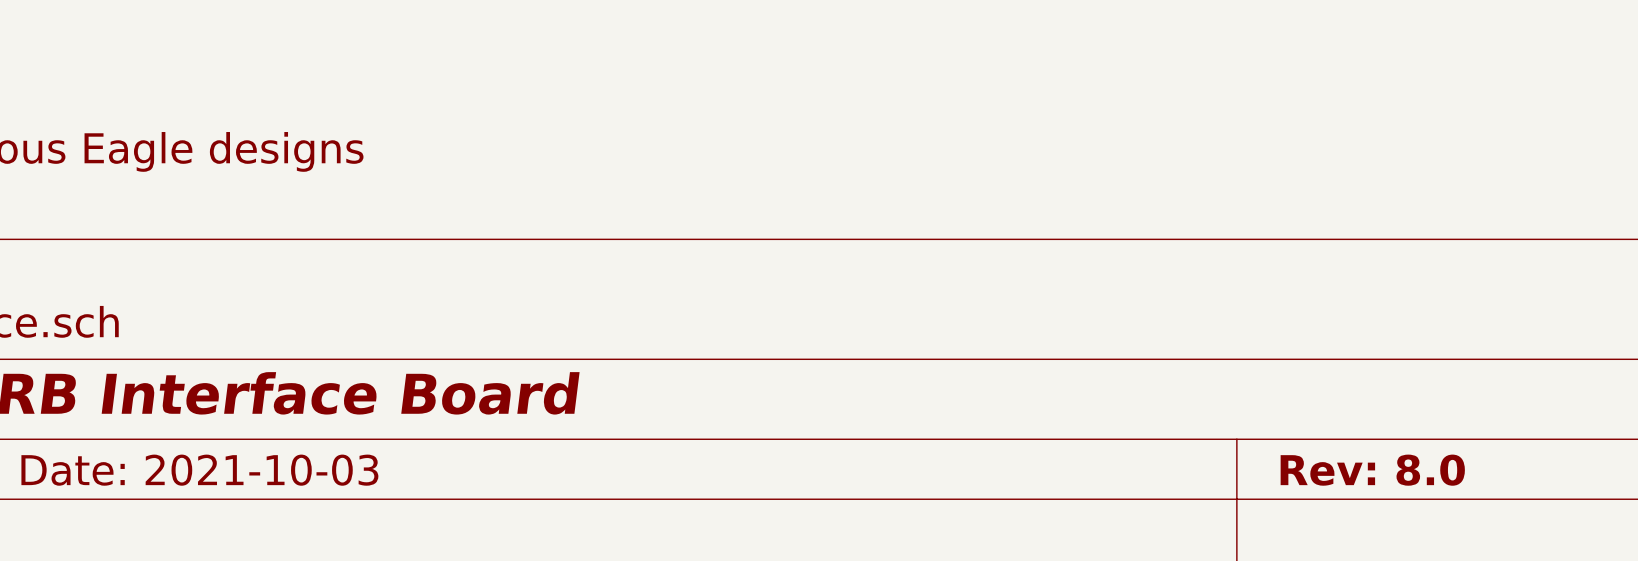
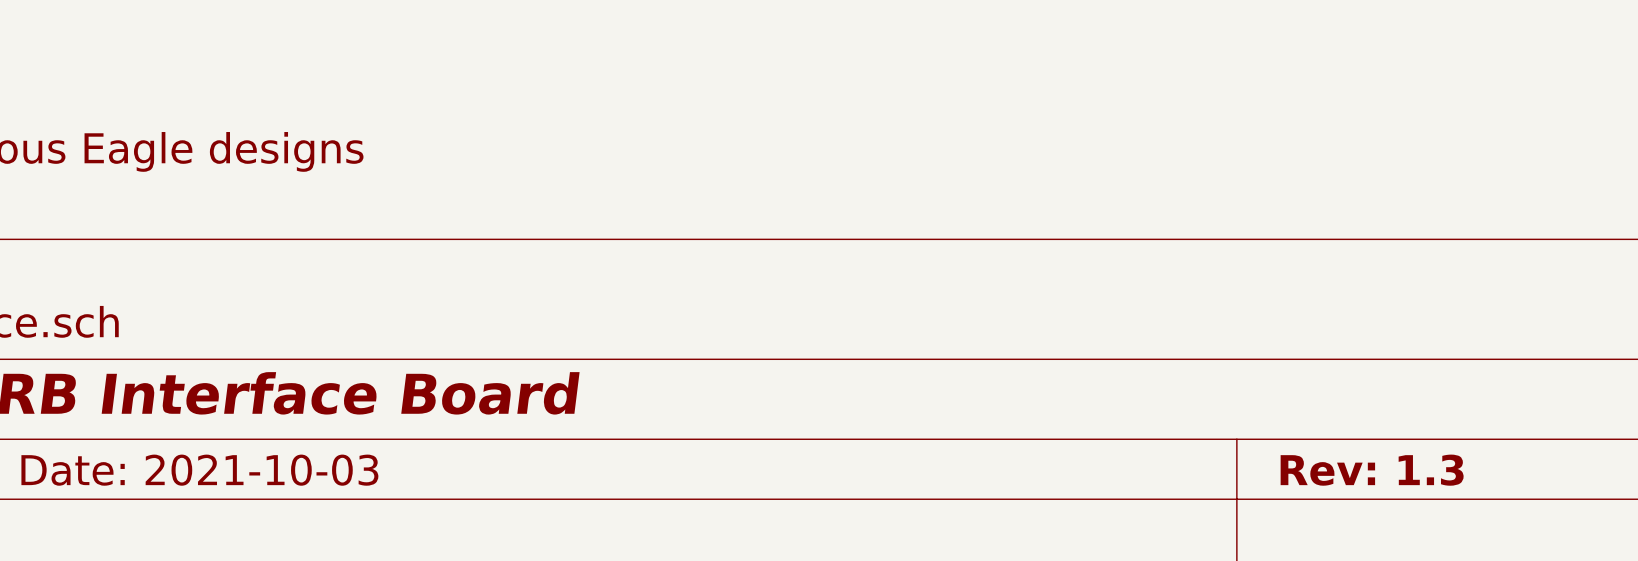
title block: Rev: 8.0 (1372, 470) -> Rev: 1.3 (1372, 470)

